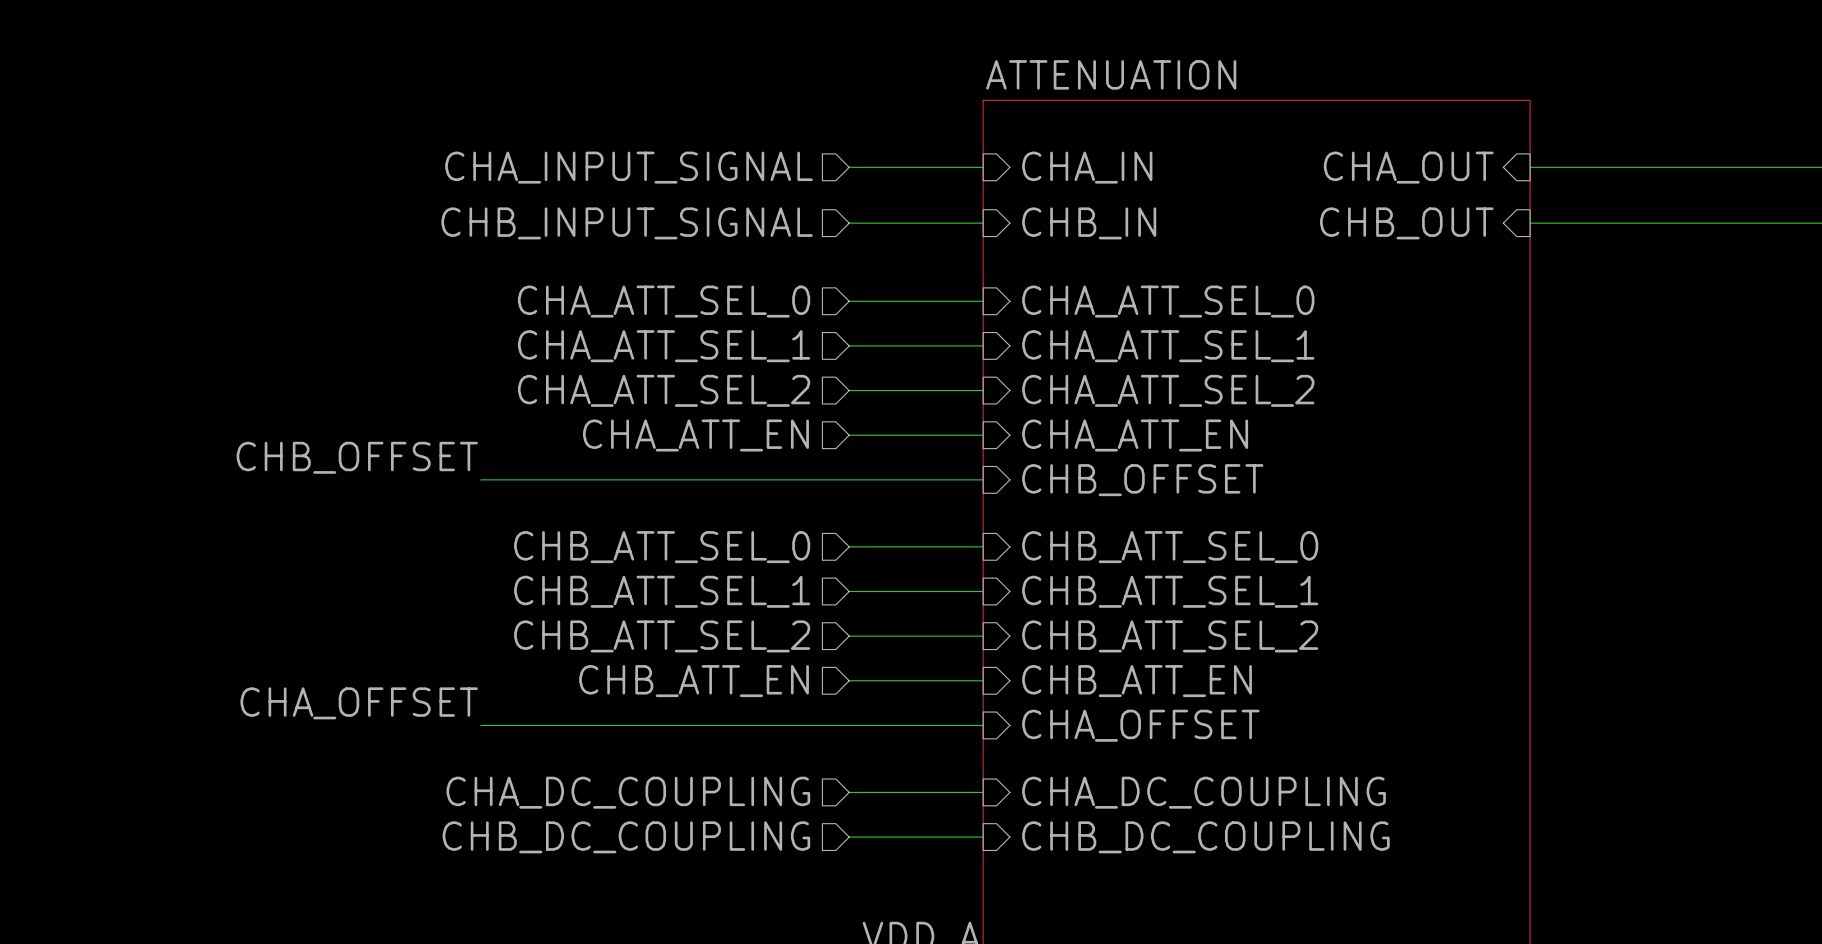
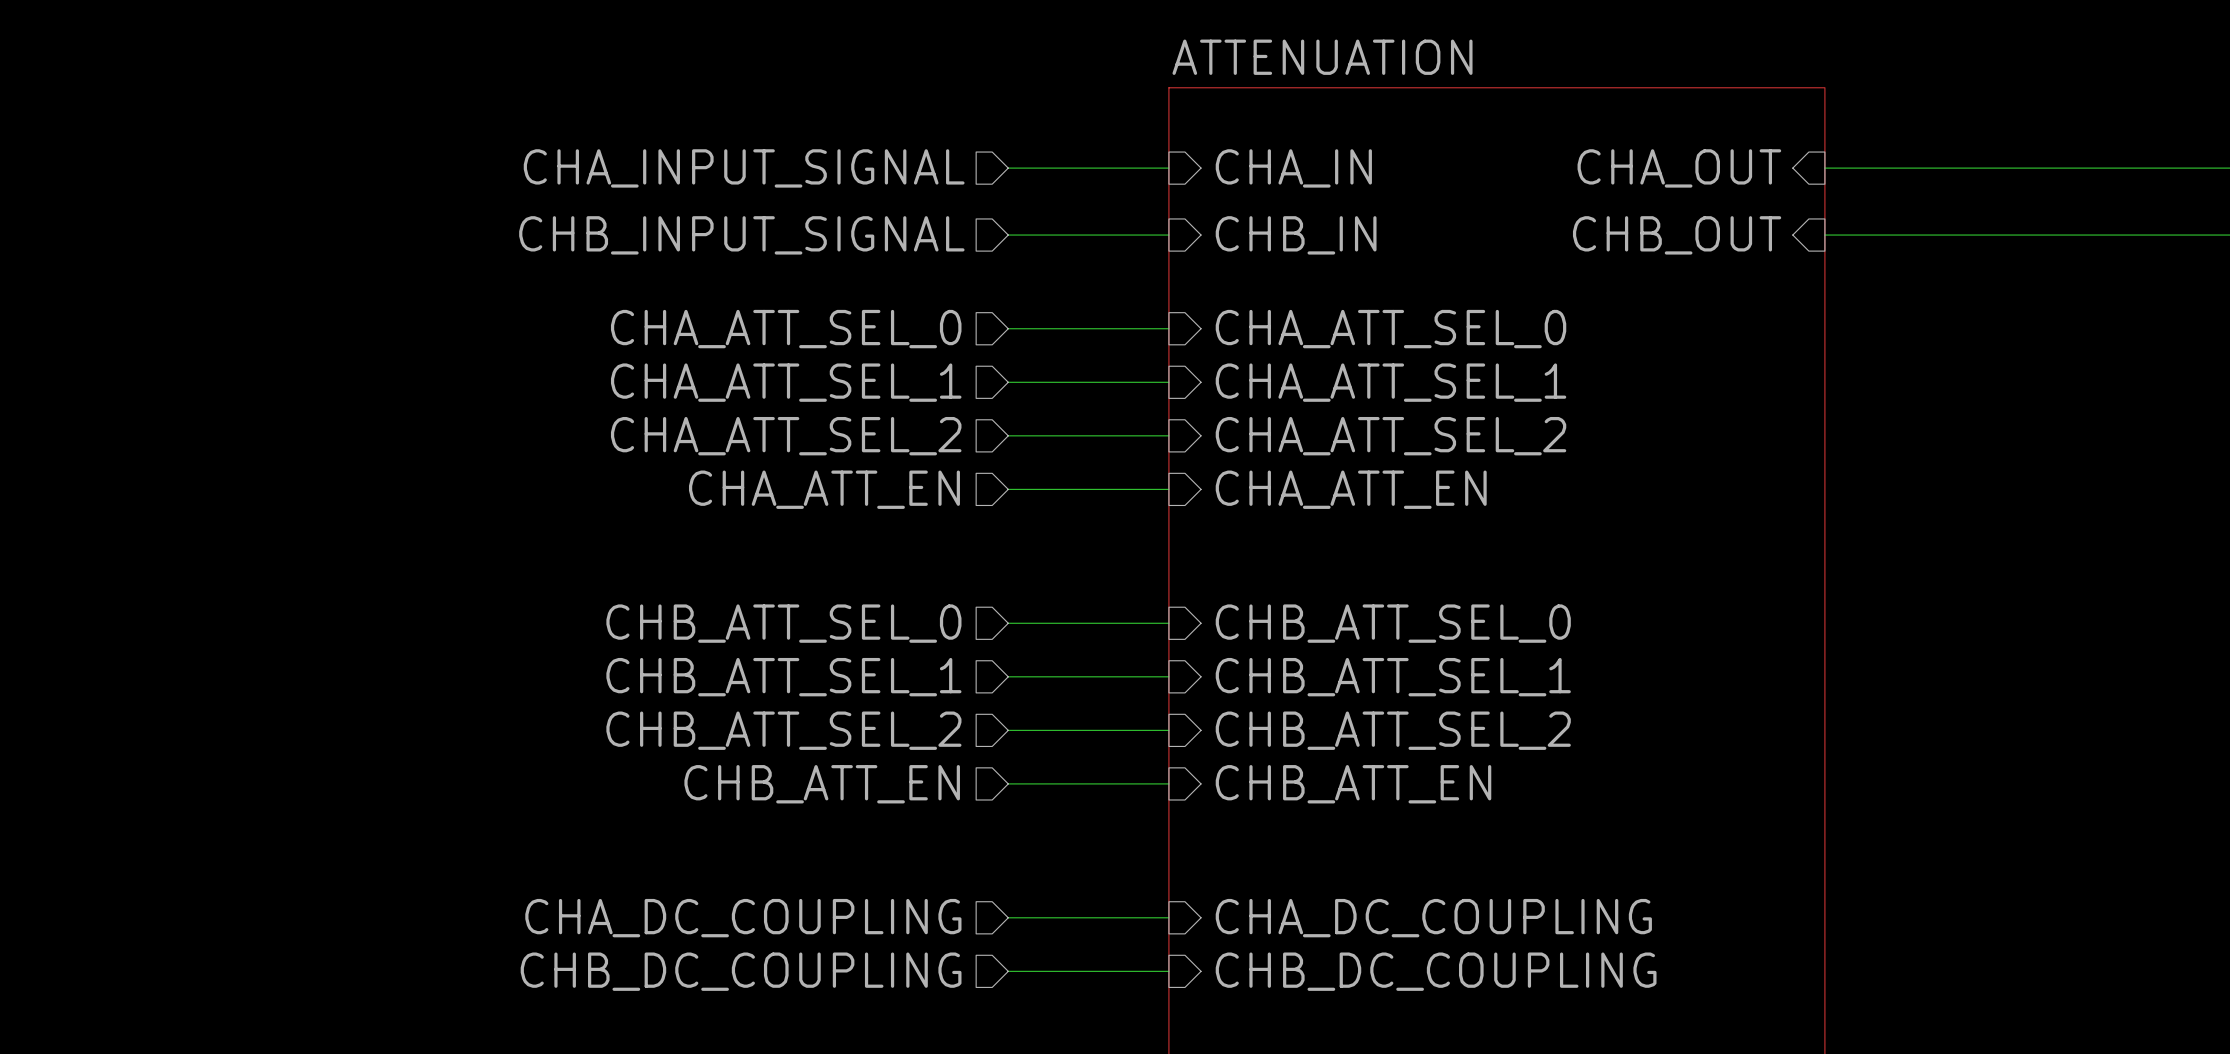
label: CHB_OFFSET (357, 457) -> none
wire: (480, 479) (983, 479) -> none
sheet pin: CHB_OFFSET (1142, 480) -> none
label: CHA_OFFSET (359, 703) -> none
wire: (480, 725) (983, 725) -> none
sheet pin: CHA_OFFSET (1140, 725) -> none

